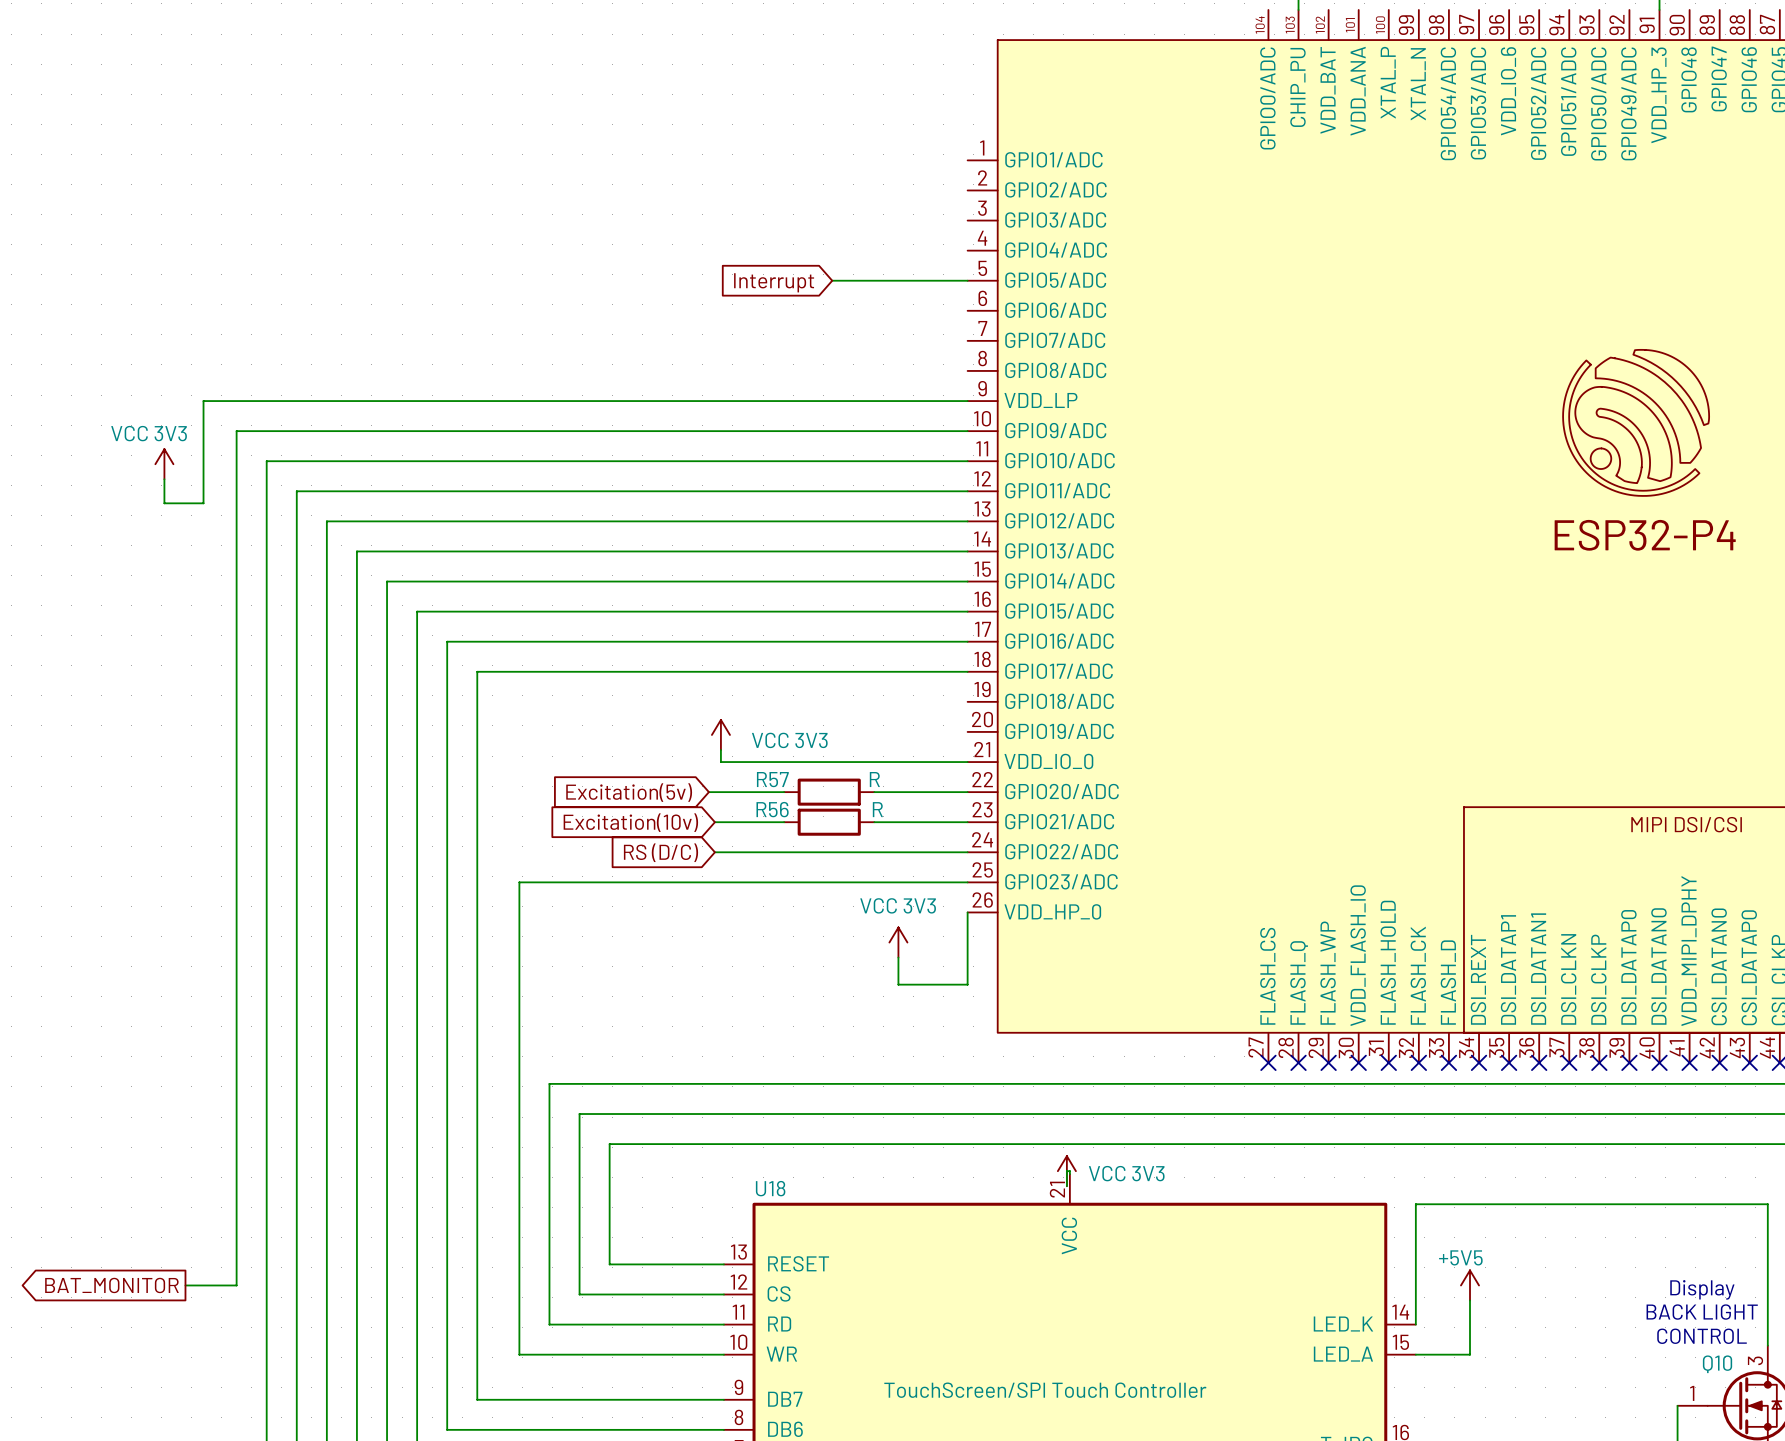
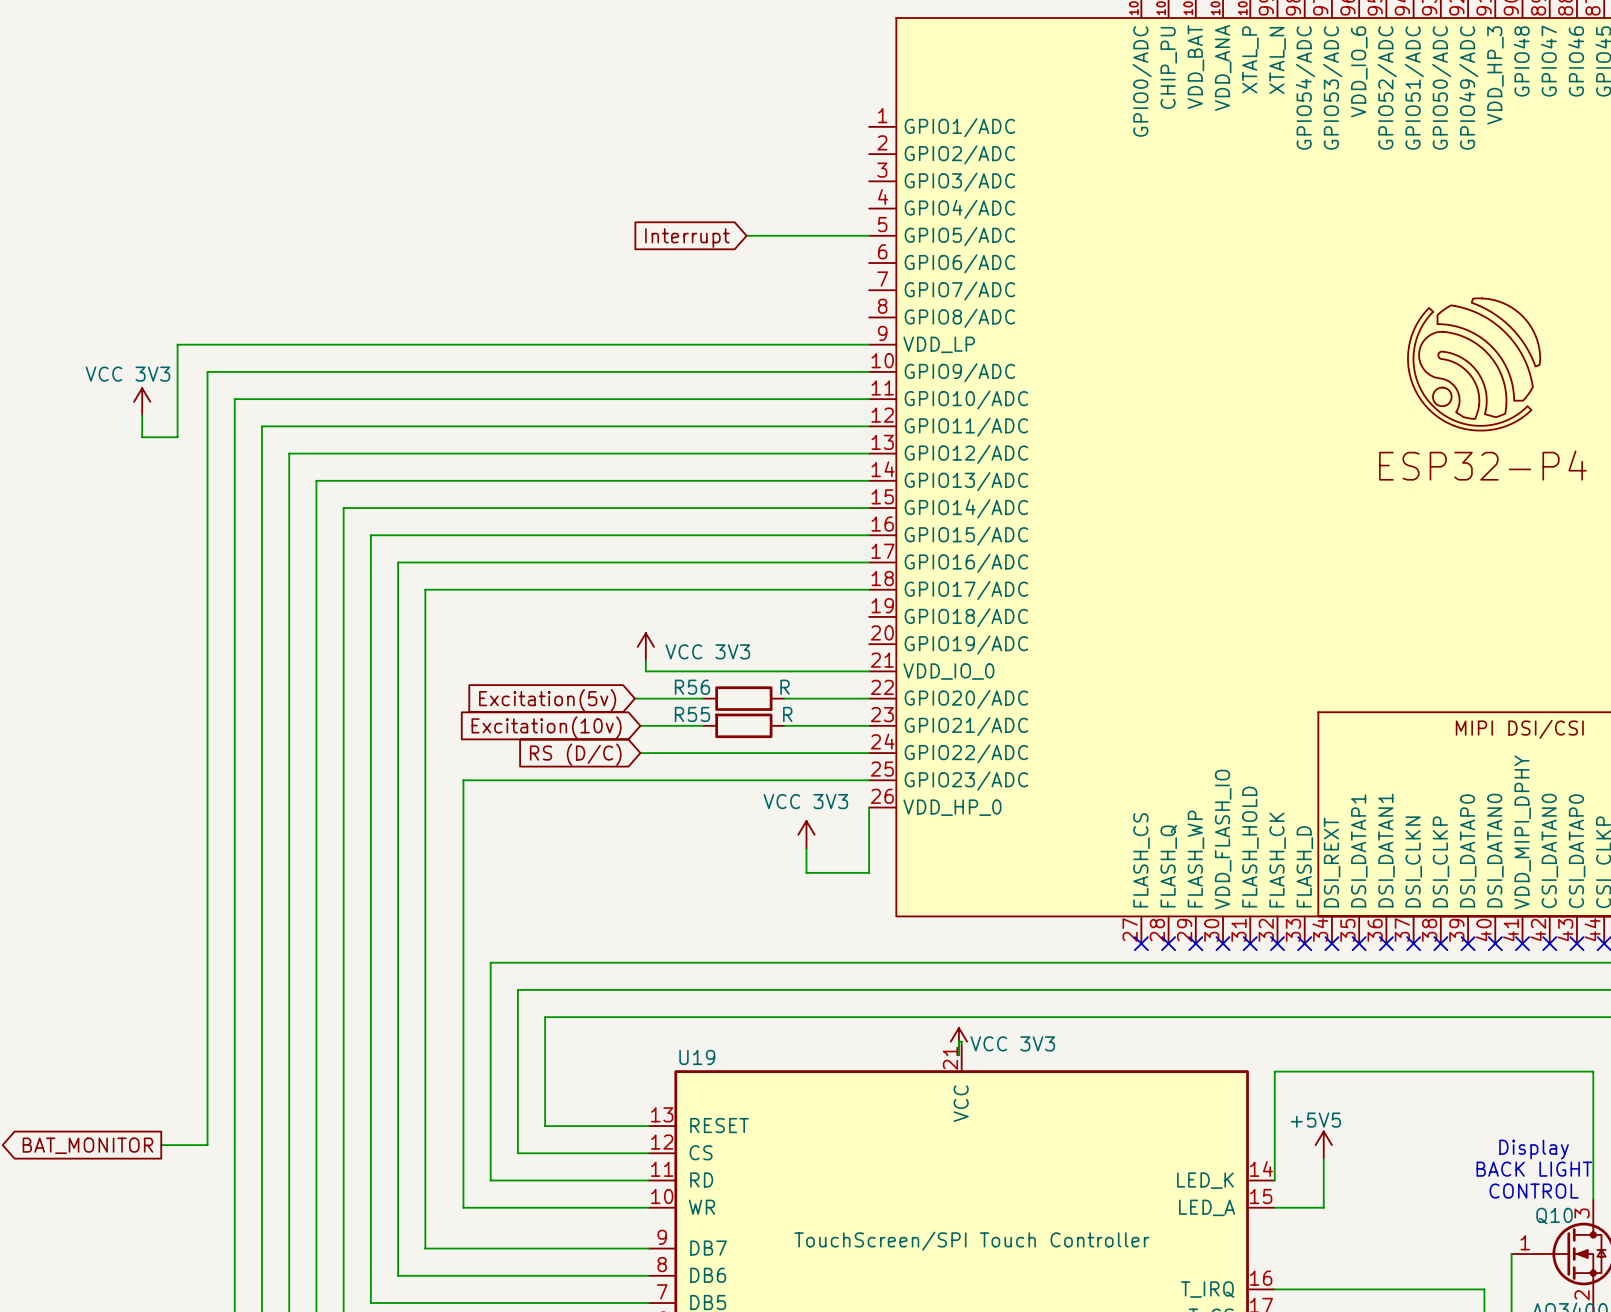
R57 name: R57 (772, 779) -> R56 (692, 687)
R56 name: R56 (772, 809) -> R55 (692, 714)
U18 name: U18 (770, 1188) -> U19 (697, 1057)

